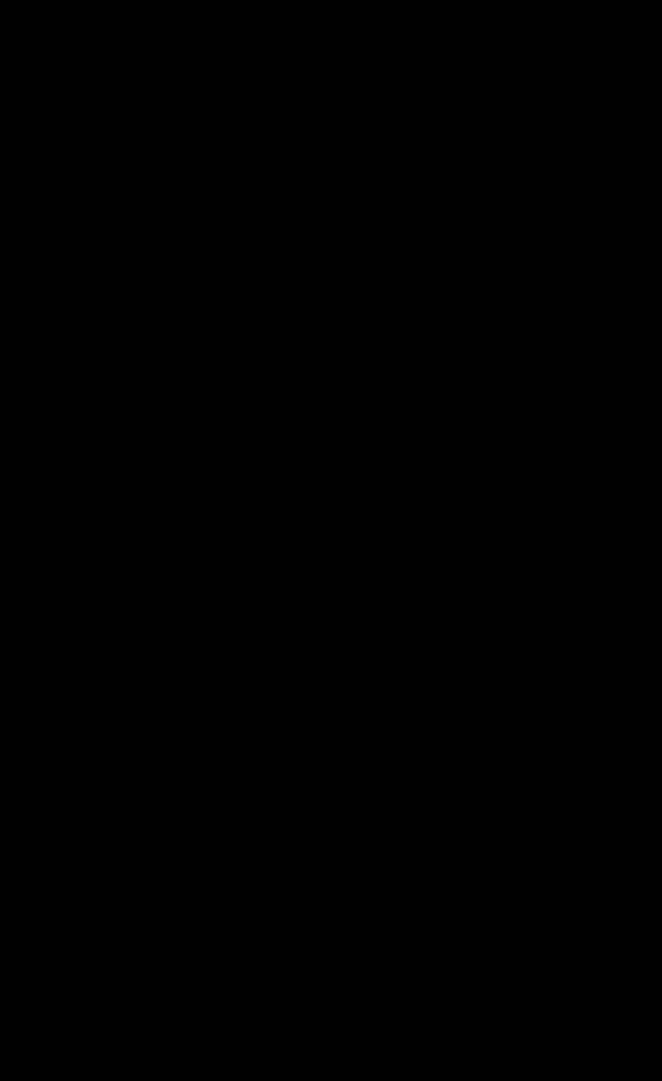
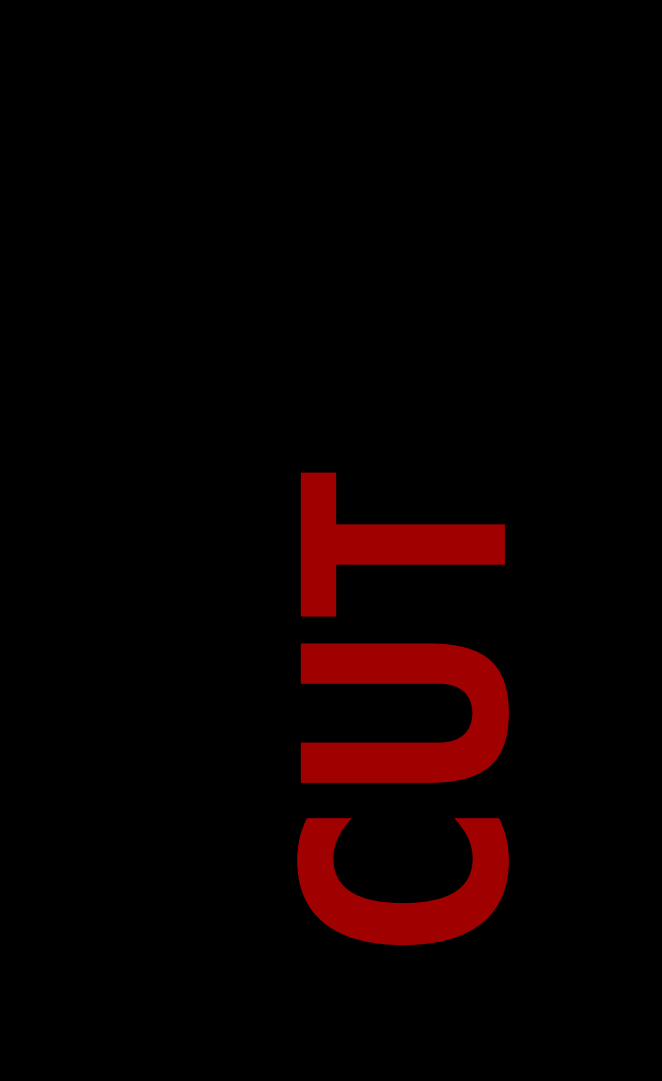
text: none -> CUT (403, 708)

